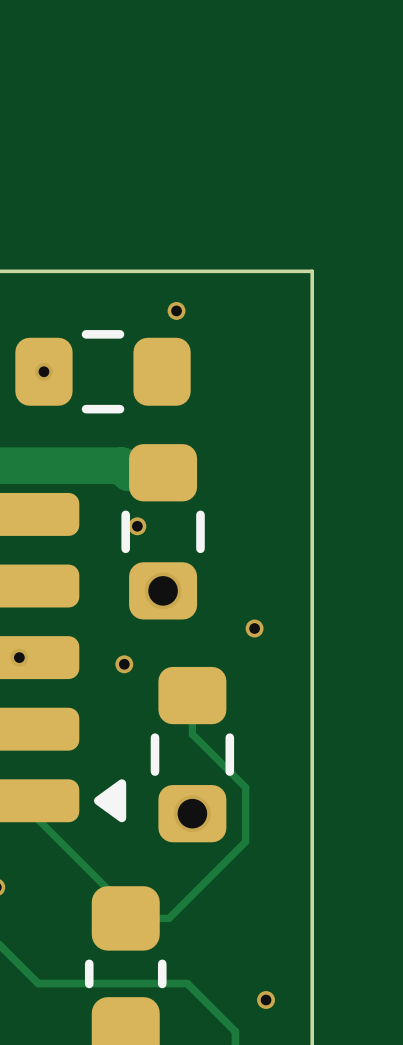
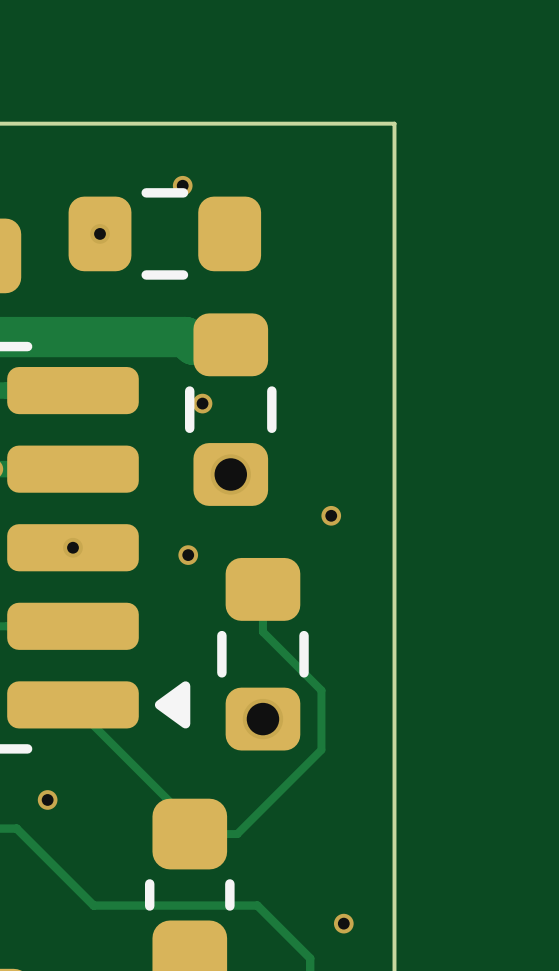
via position: (176, 310) -> (182, 185)

